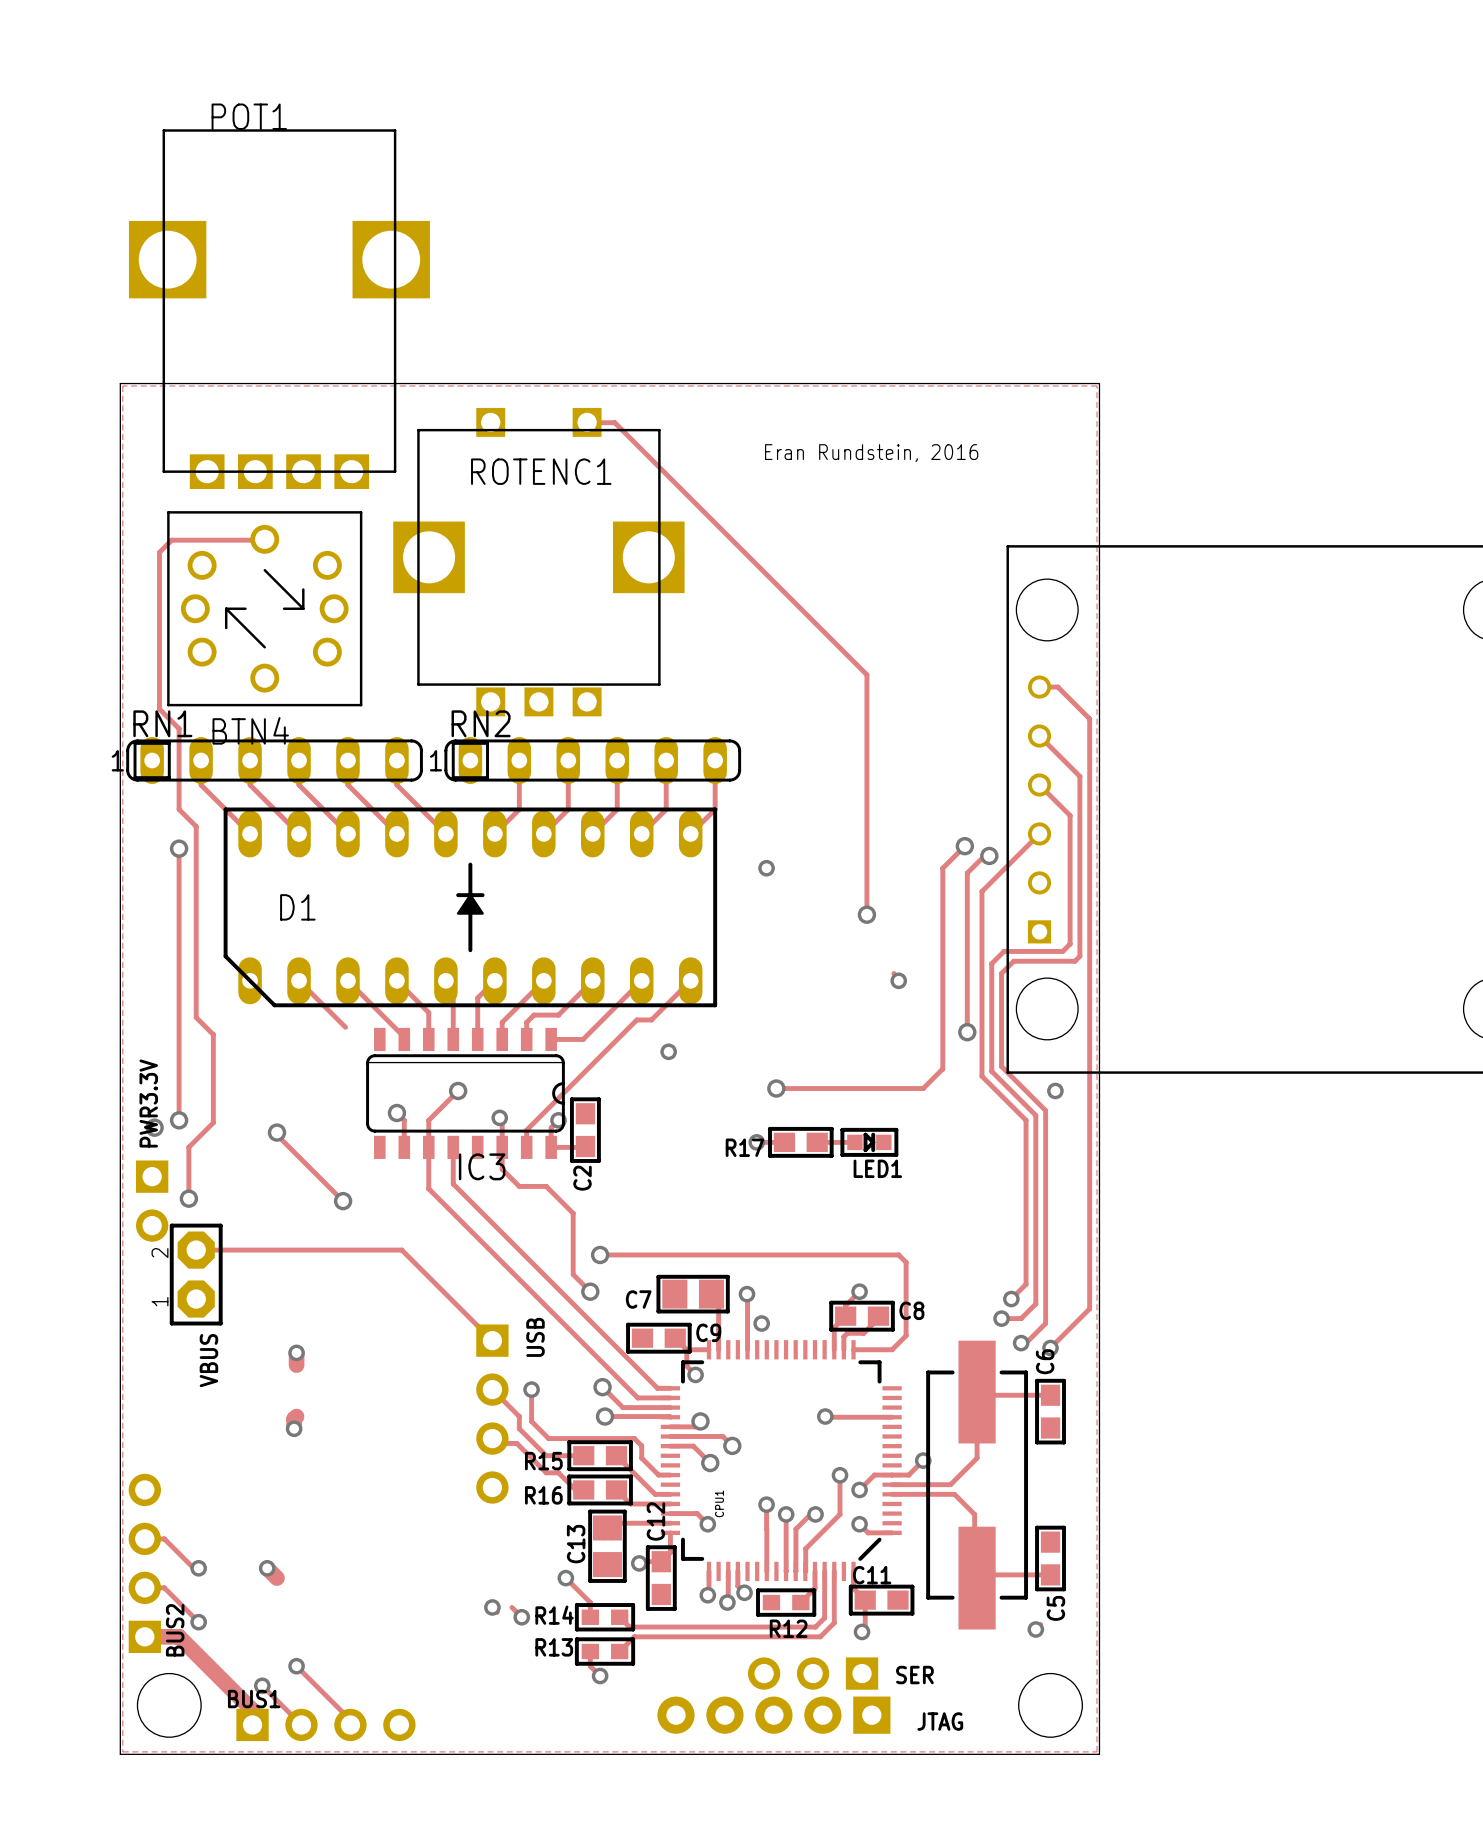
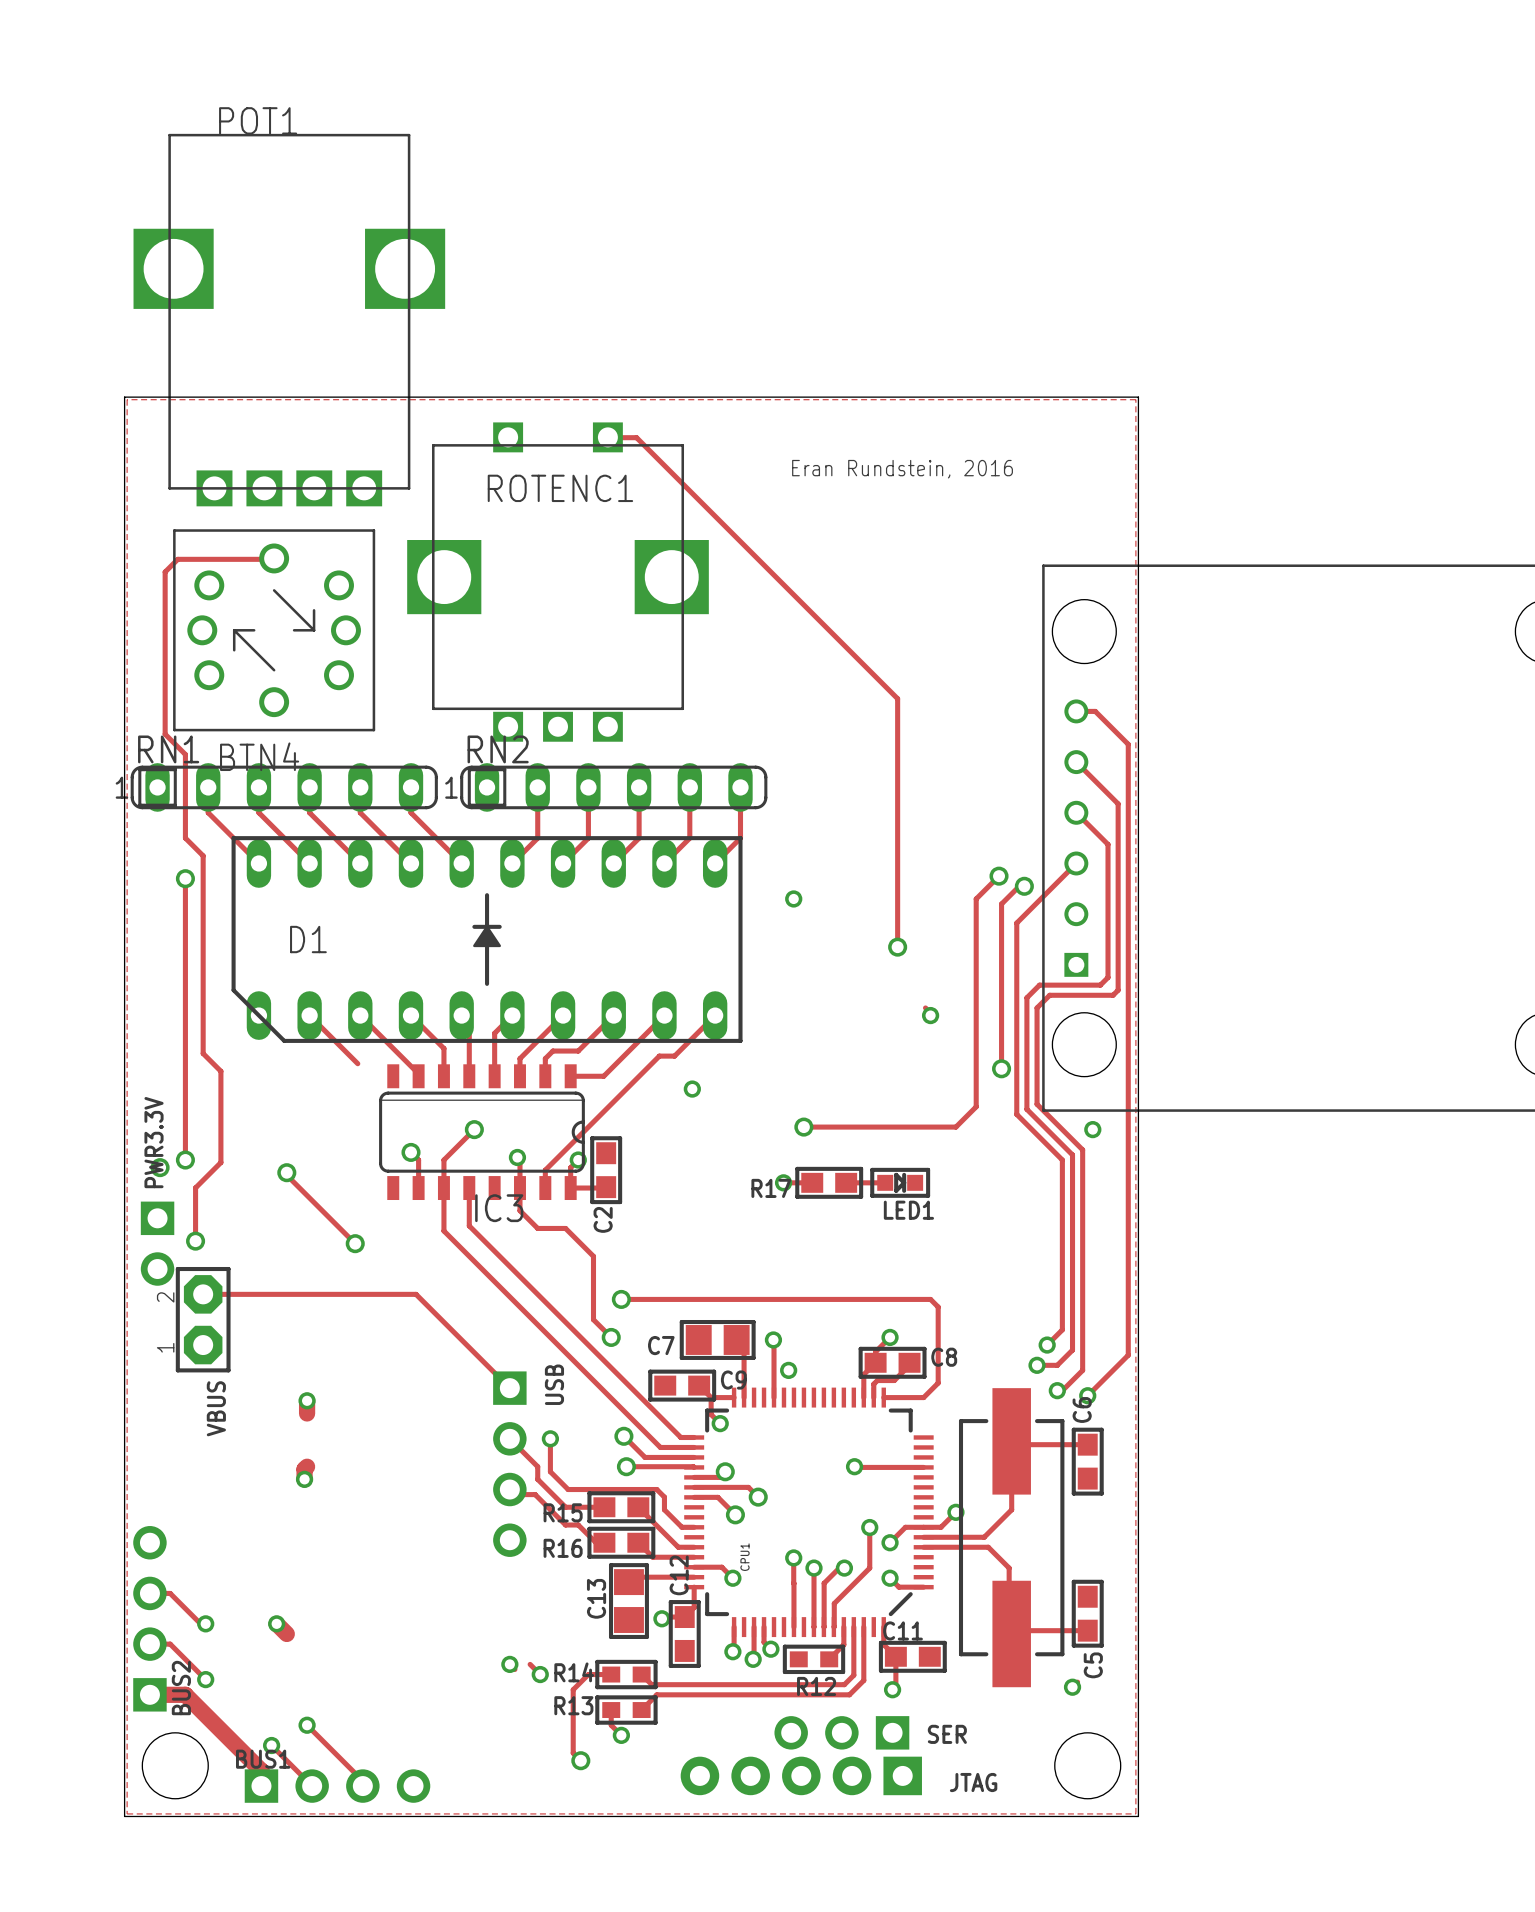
track: (565, 1578) (590, 1602) (590, 1617) -> (580, 1760) (573, 1753) (573, 1689) (588, 1674) (611, 1674)
via: (565, 1578) -> none
via: none -> (580, 1760)

